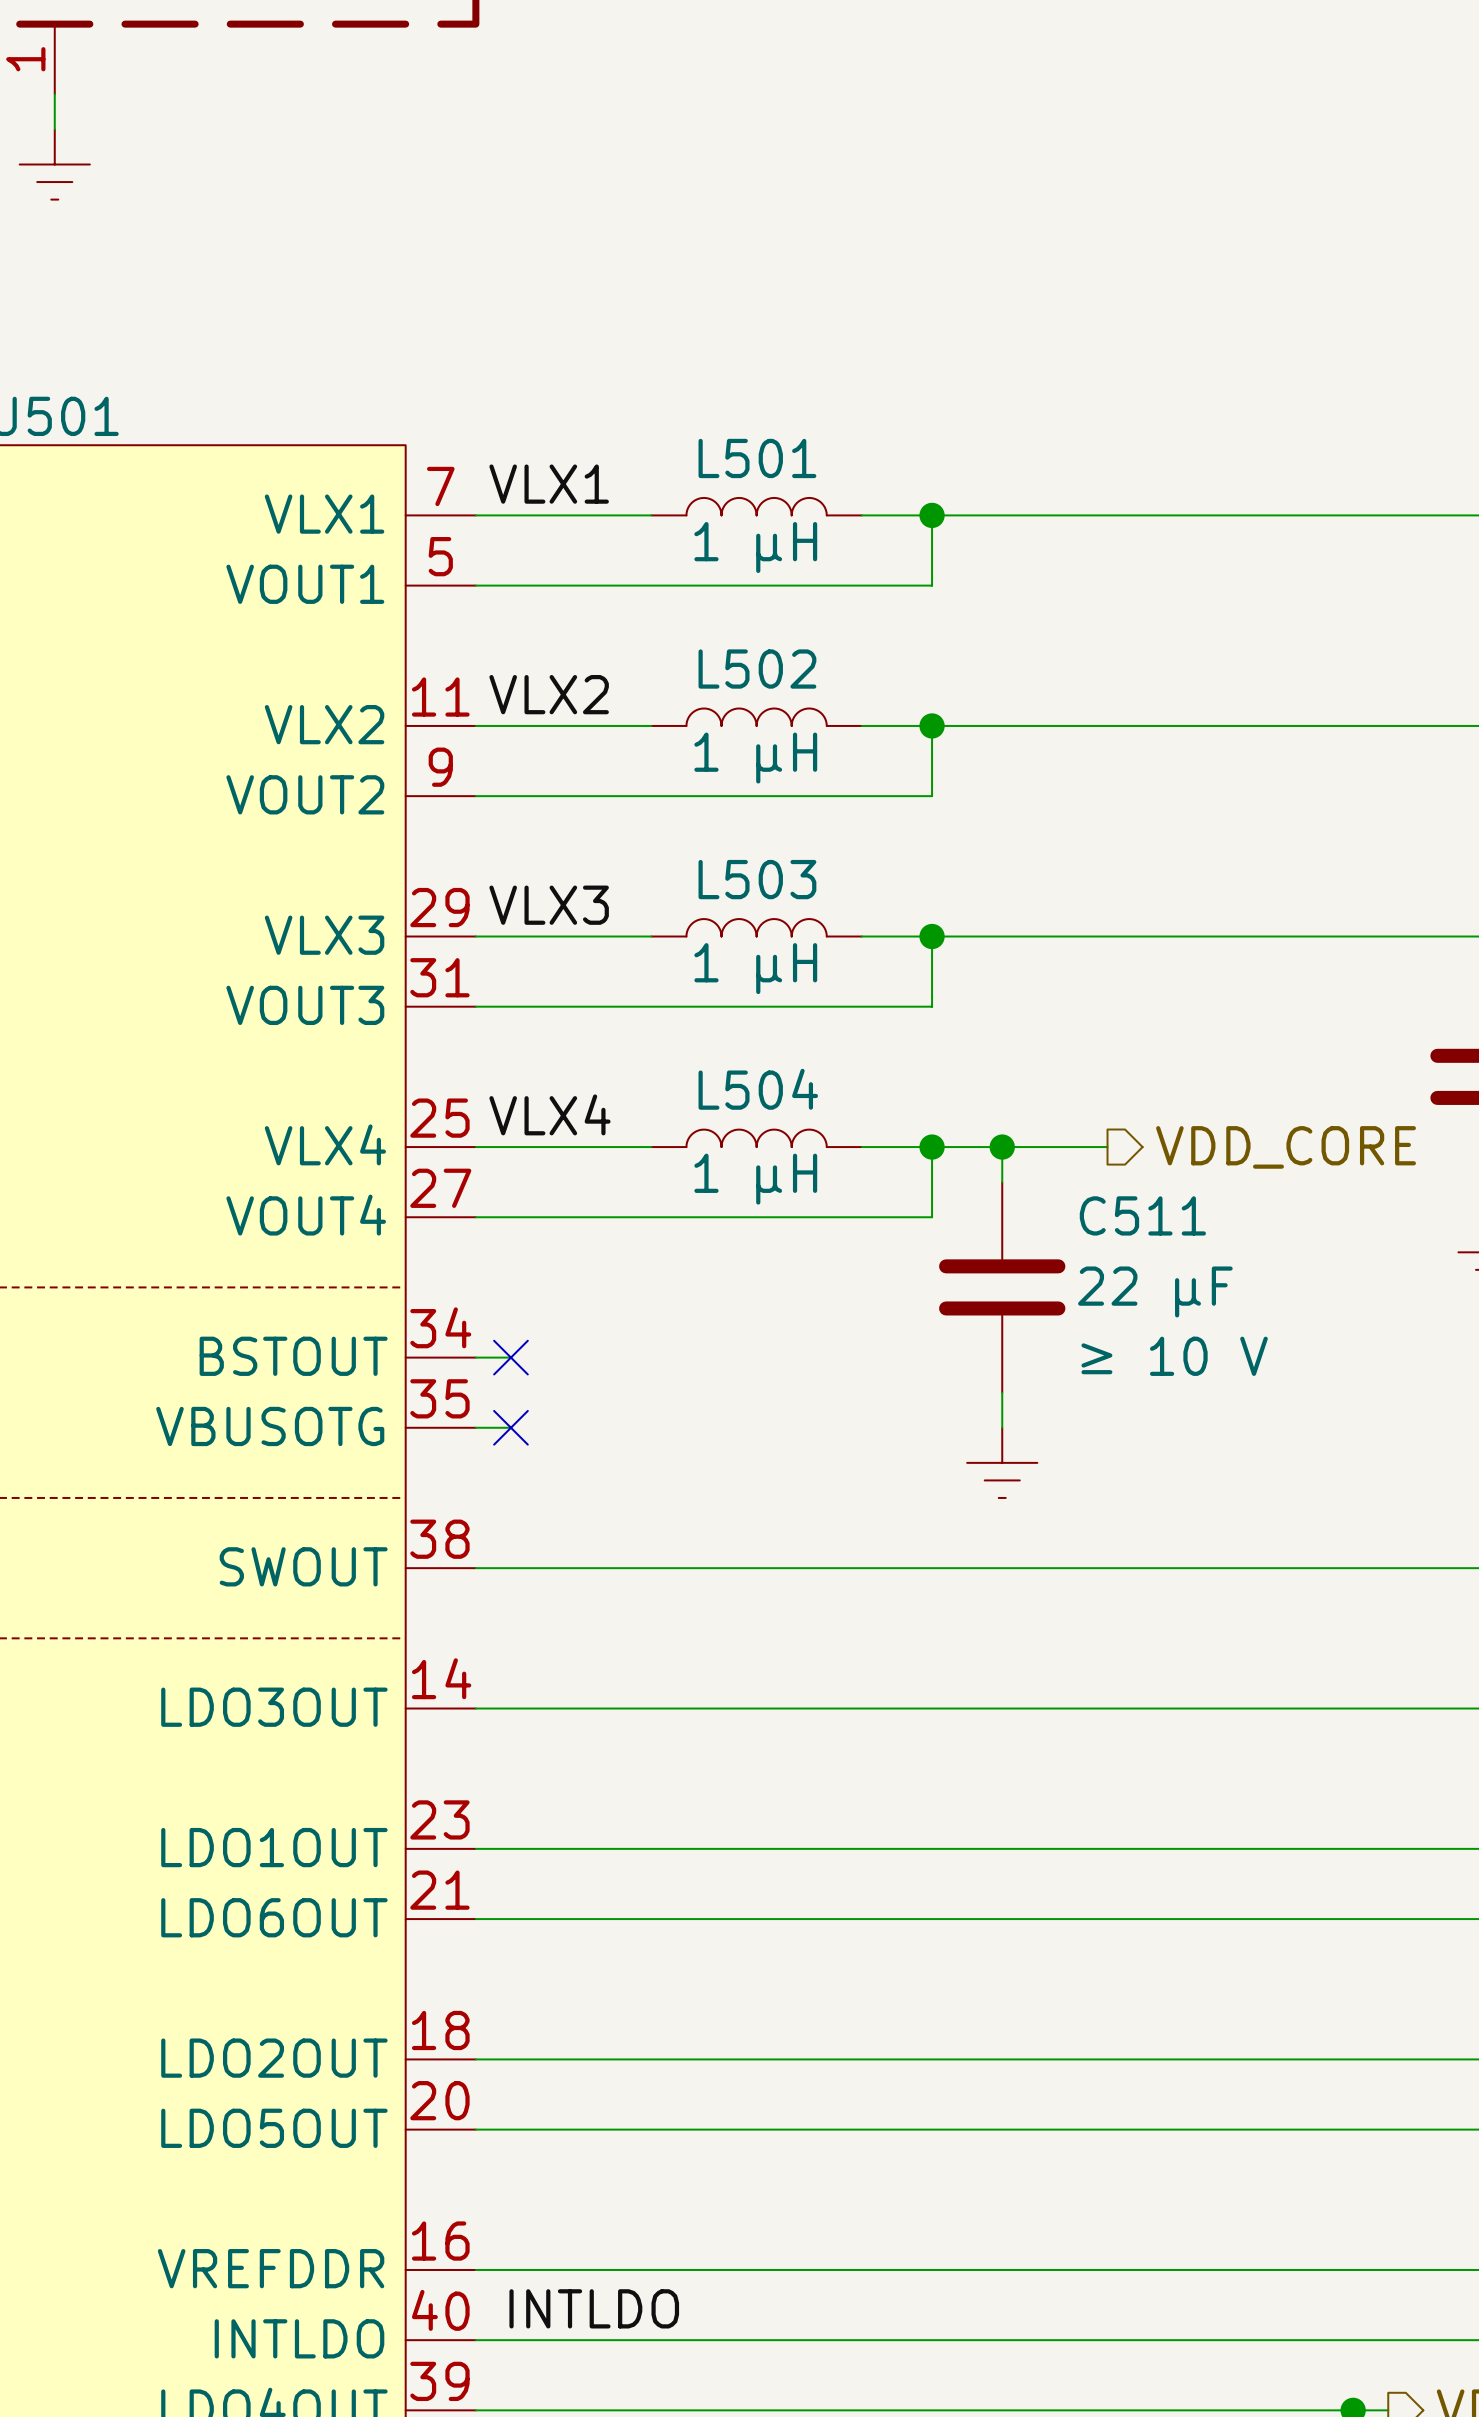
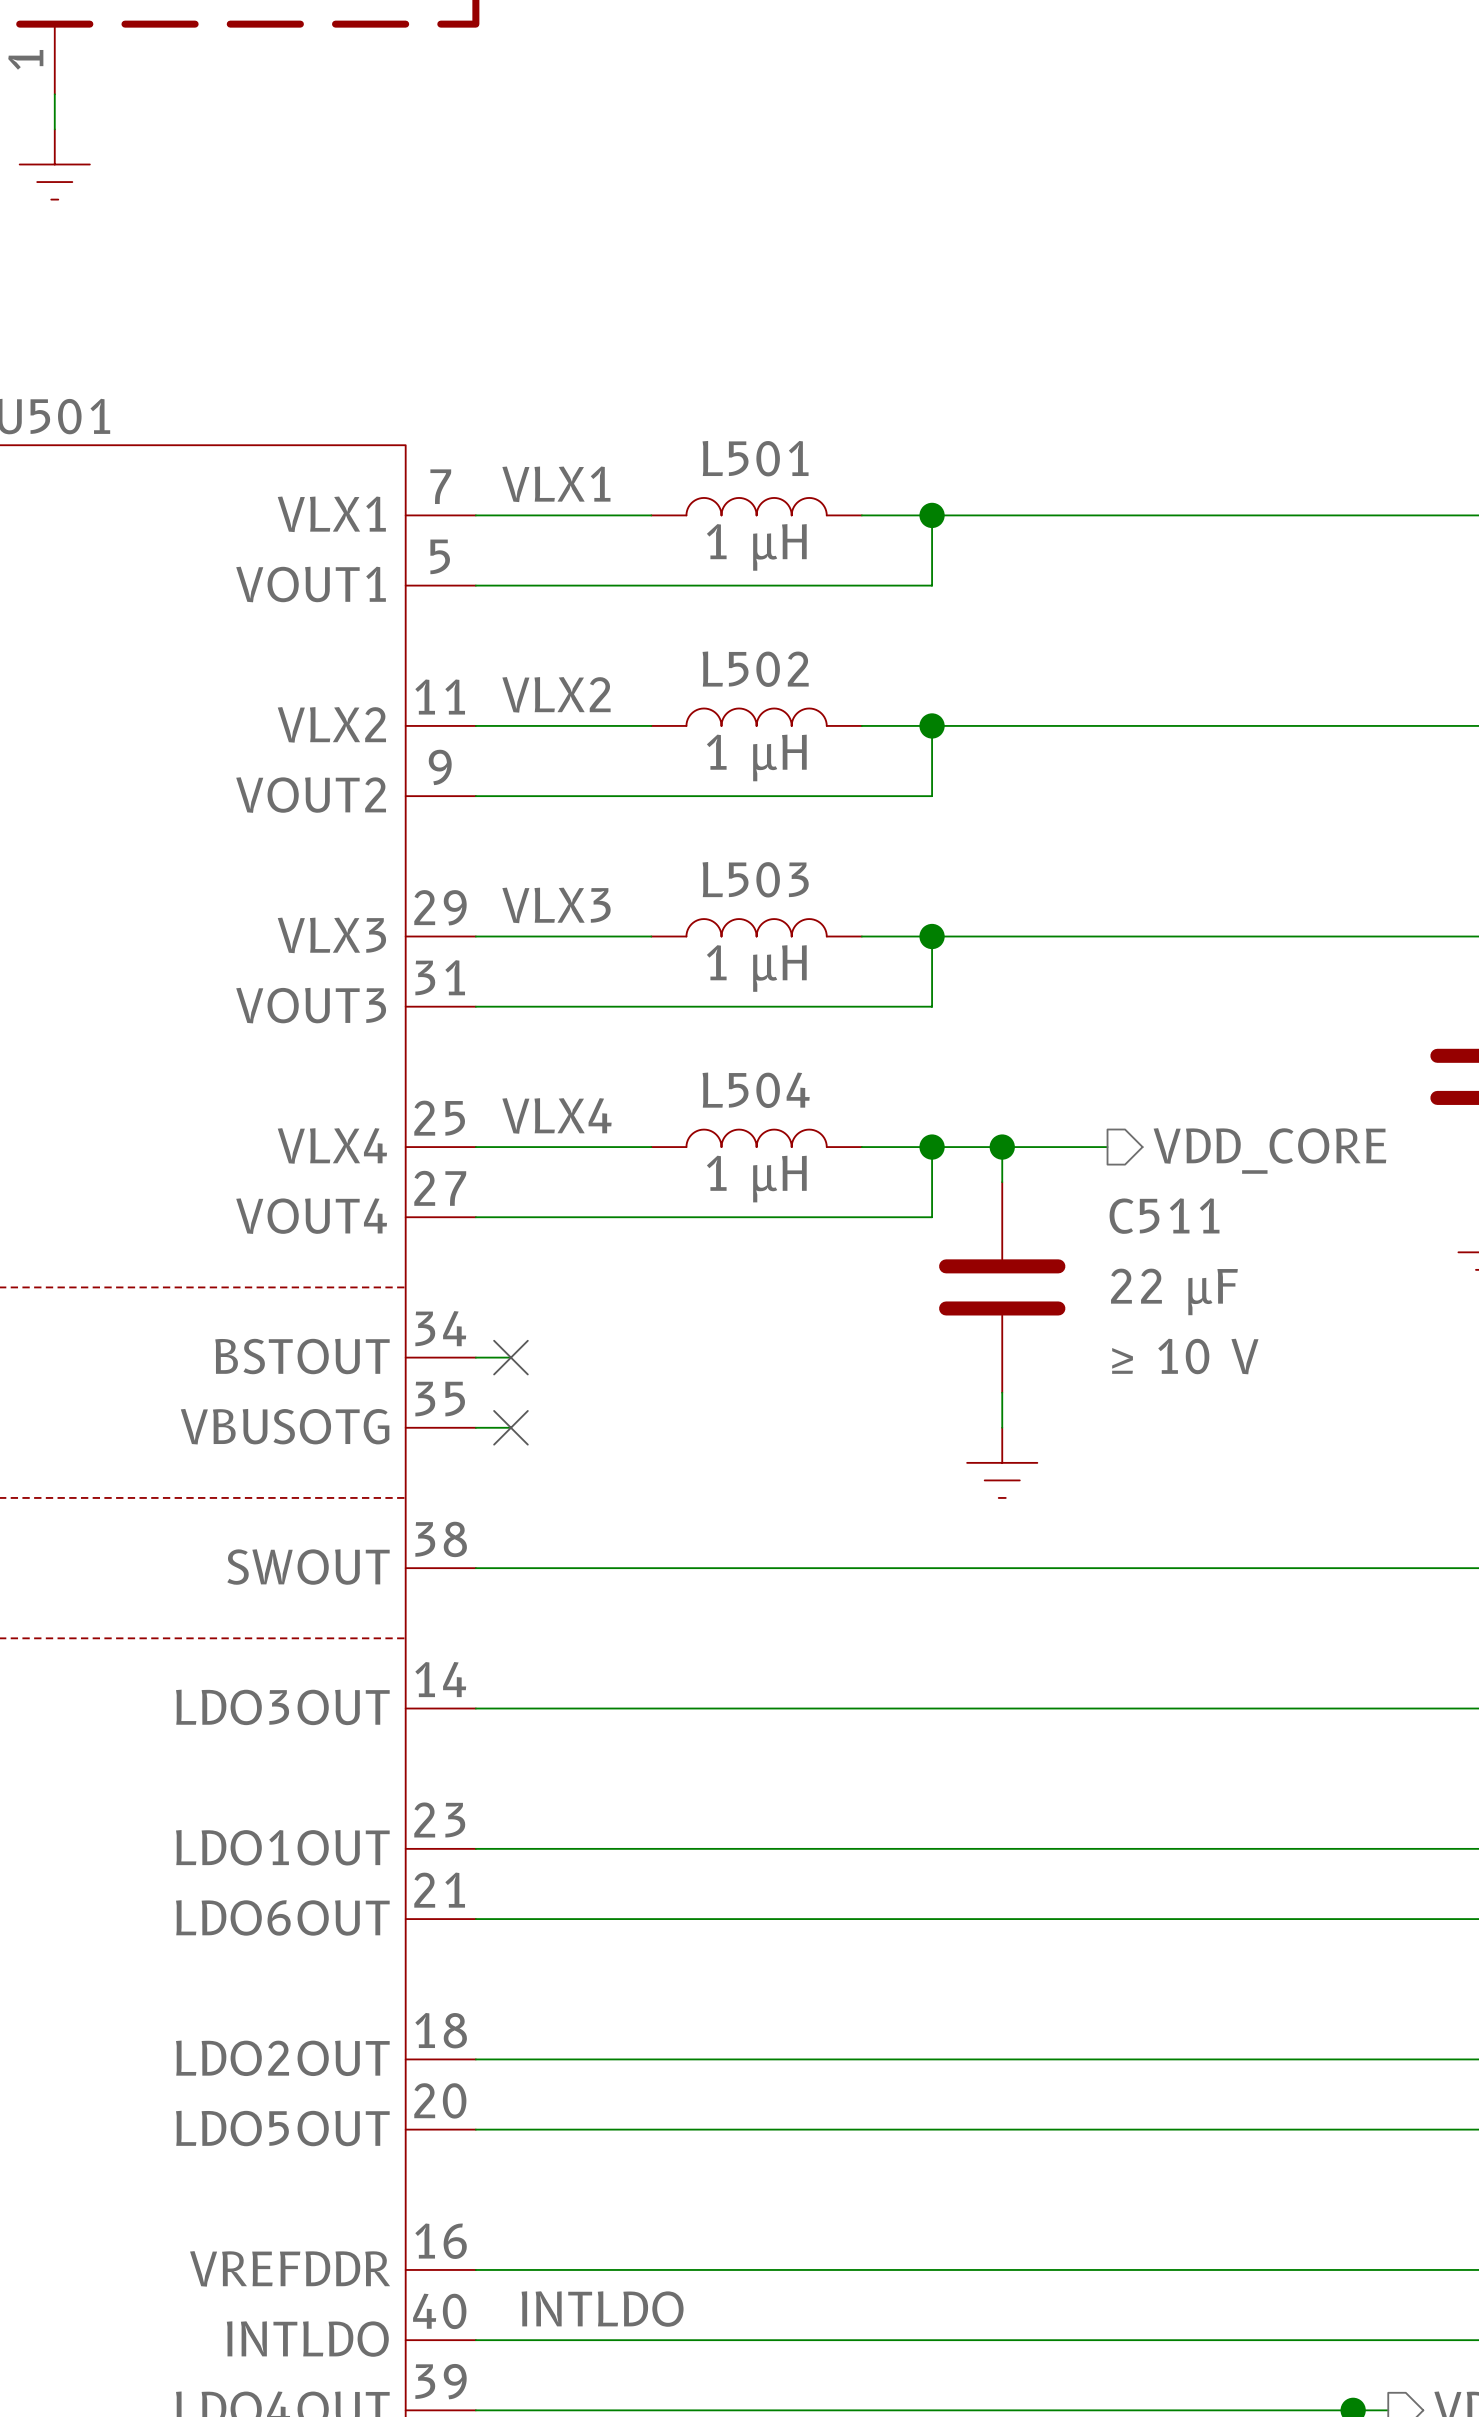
C511 name position: C511 (1142, 1215) -> C511 (1164, 1216)
C511 value position: 22 µF (1155, 1291) -> 22 µF (1174, 1291)
C511 text position: ≥ 10 V (1174, 1356) -> ≥ 10 V (1185, 1356)

